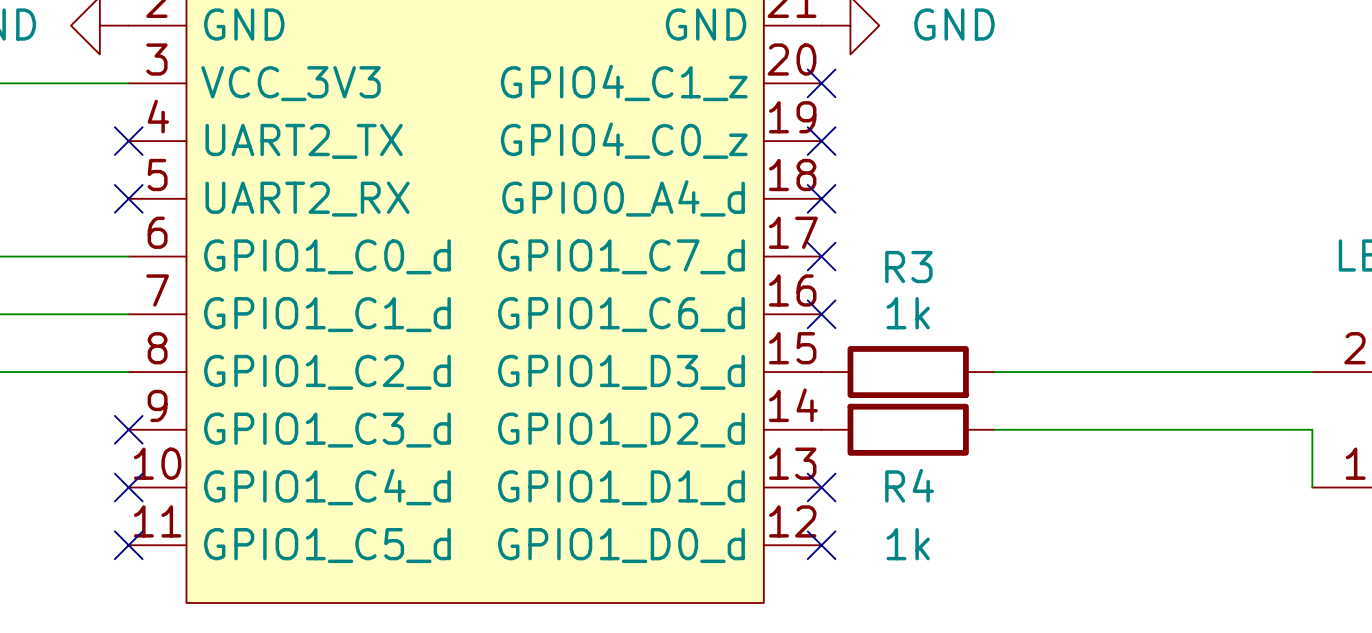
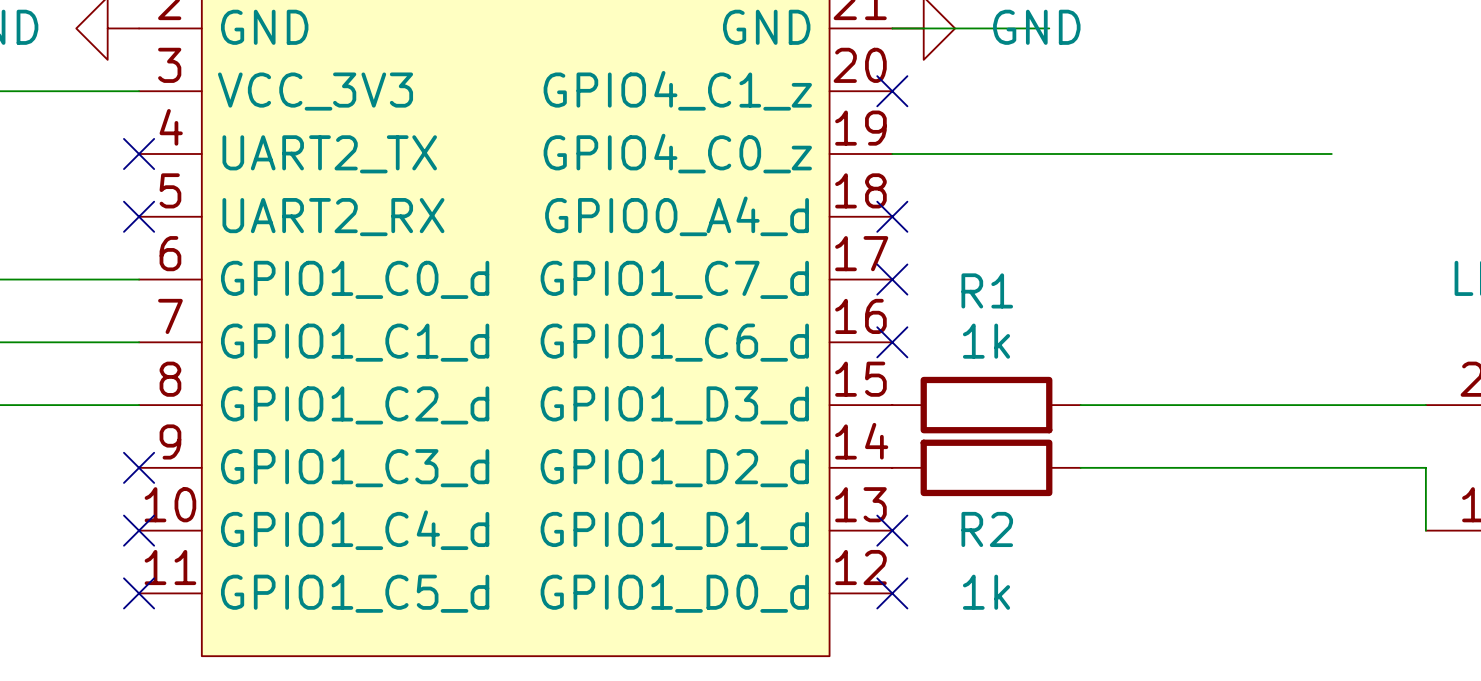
wire: none -> (892, 28) (1049, 28)
wire: none -> (892, 154) (1331, 154)
no-connect mark: (821, 141) -> none
R3 name: R3 (908, 267) -> R1 (987, 290)
R4 name: R4 (909, 485) -> R2 (987, 529)

